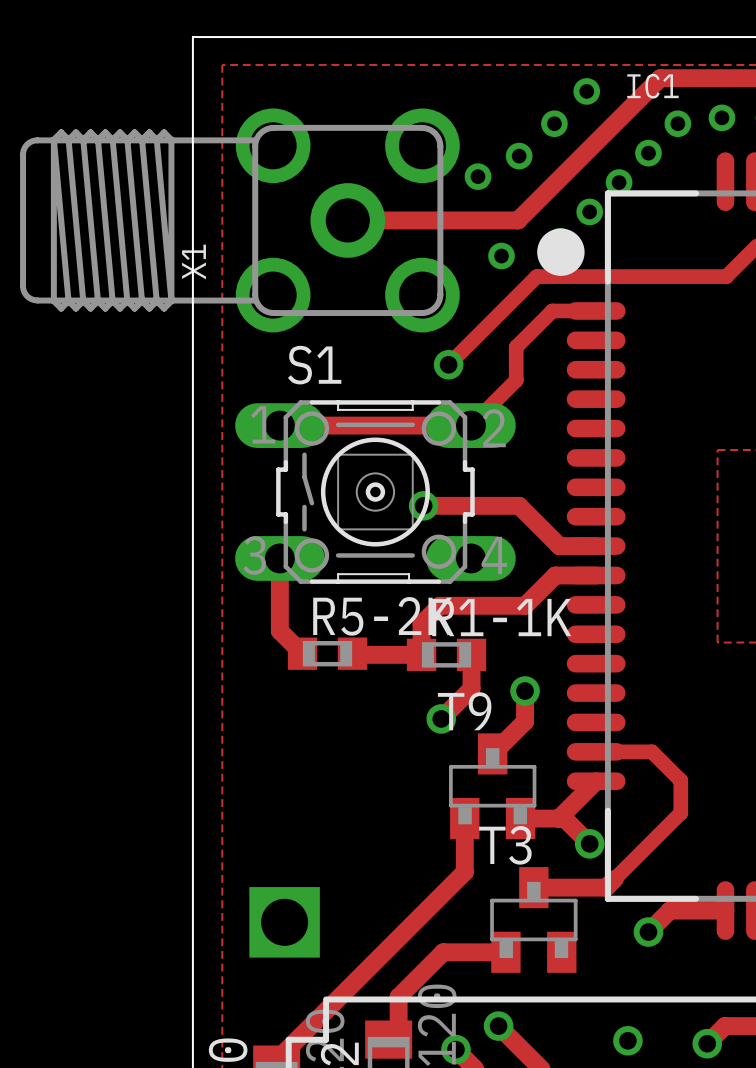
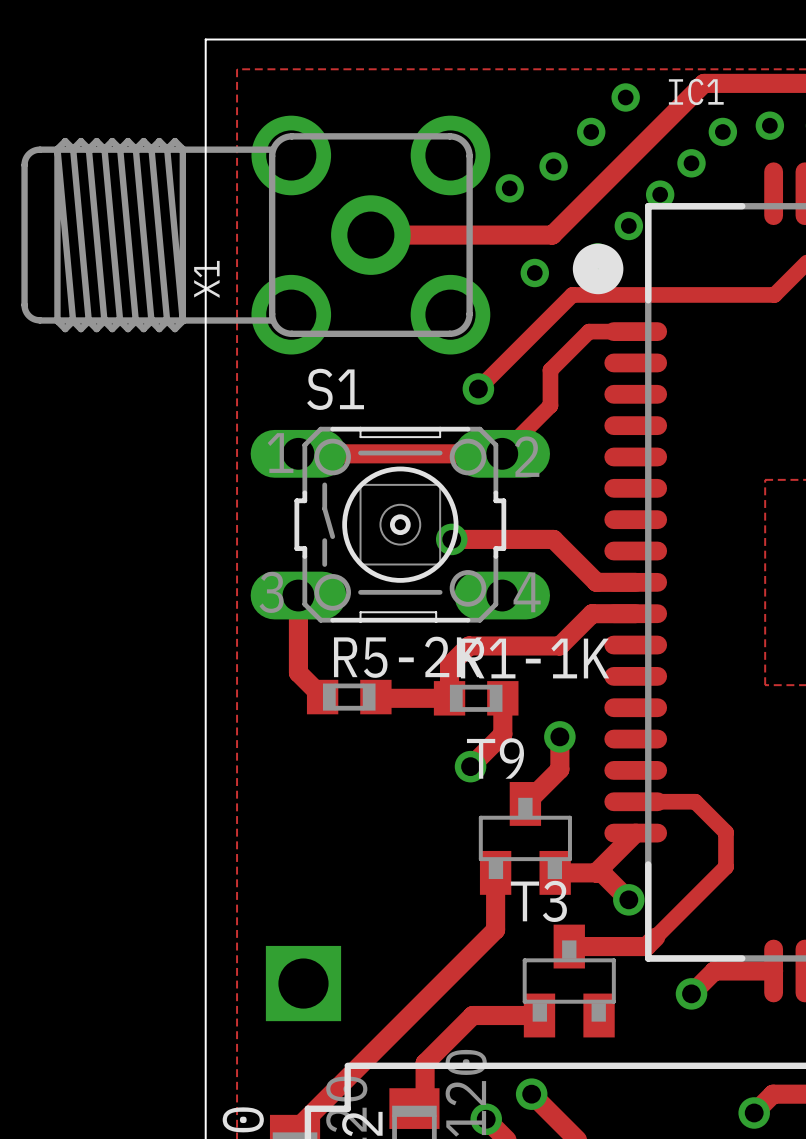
via: (627, 1040) -> none

